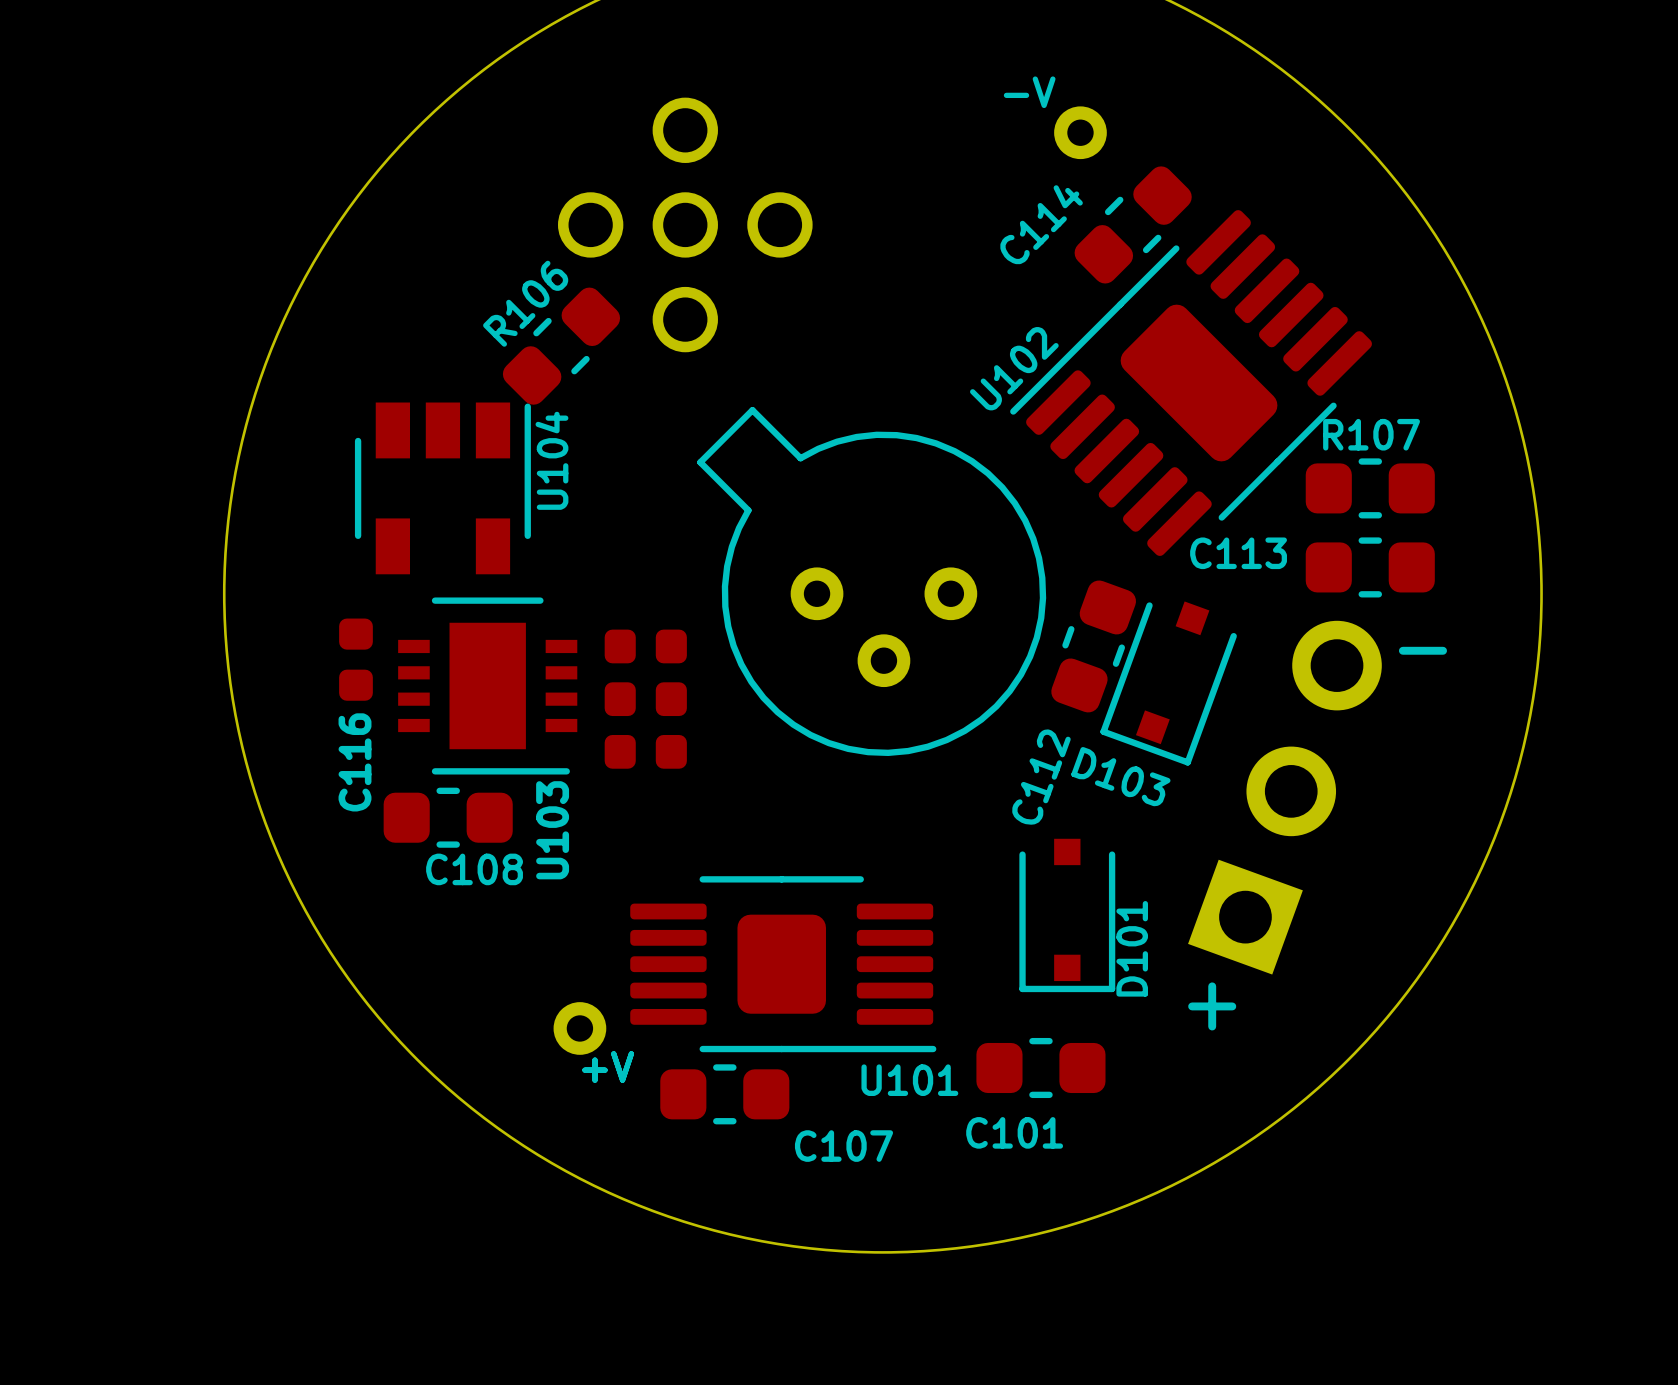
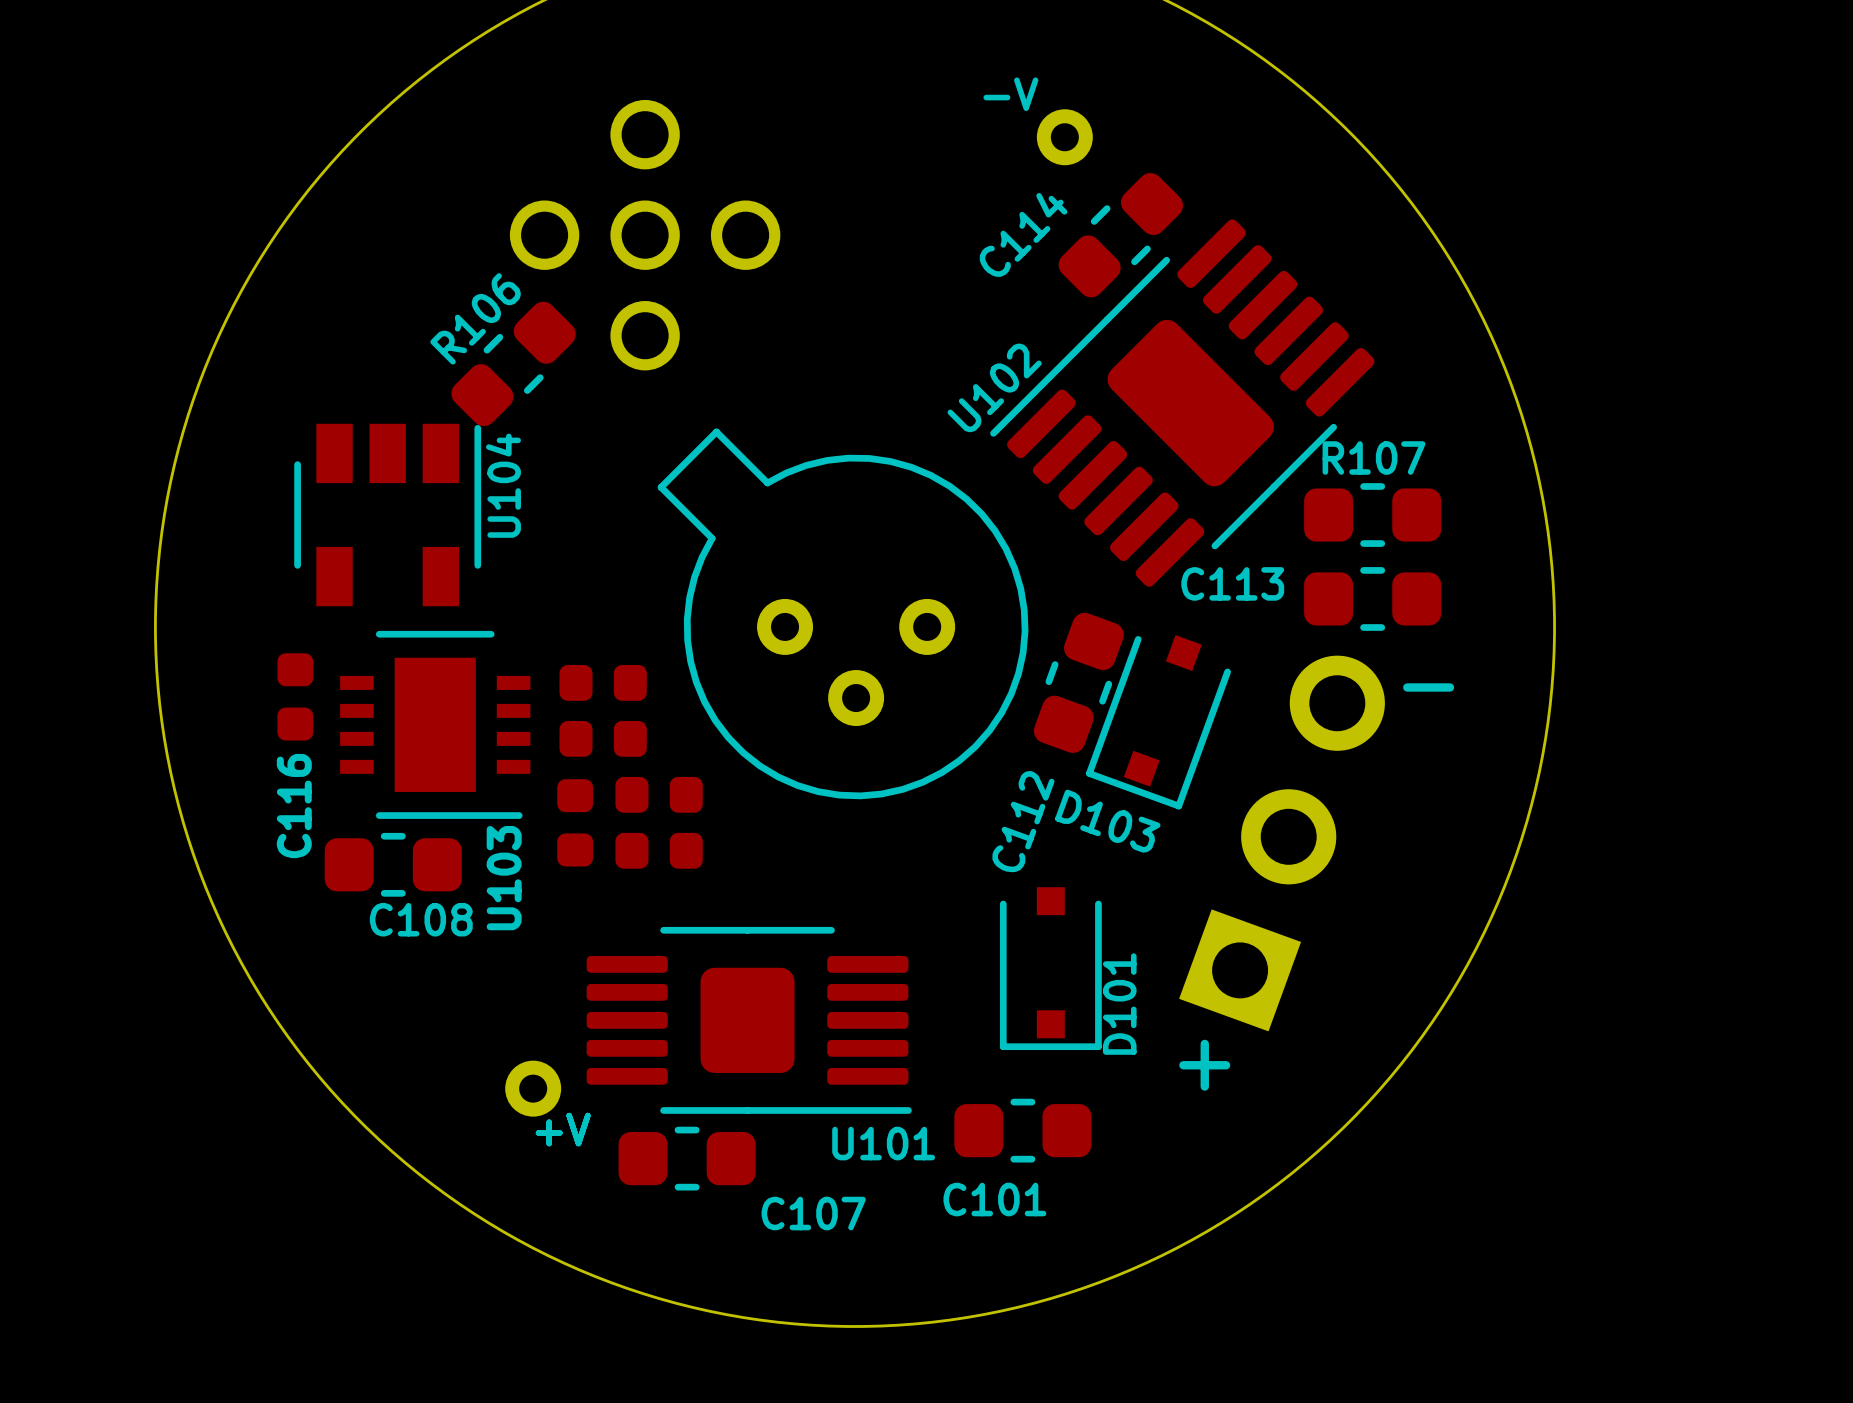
part: (645, 751) -> none
part: none -> (659, 794)
part: none -> (575, 822)
part: none -> (659, 850)

